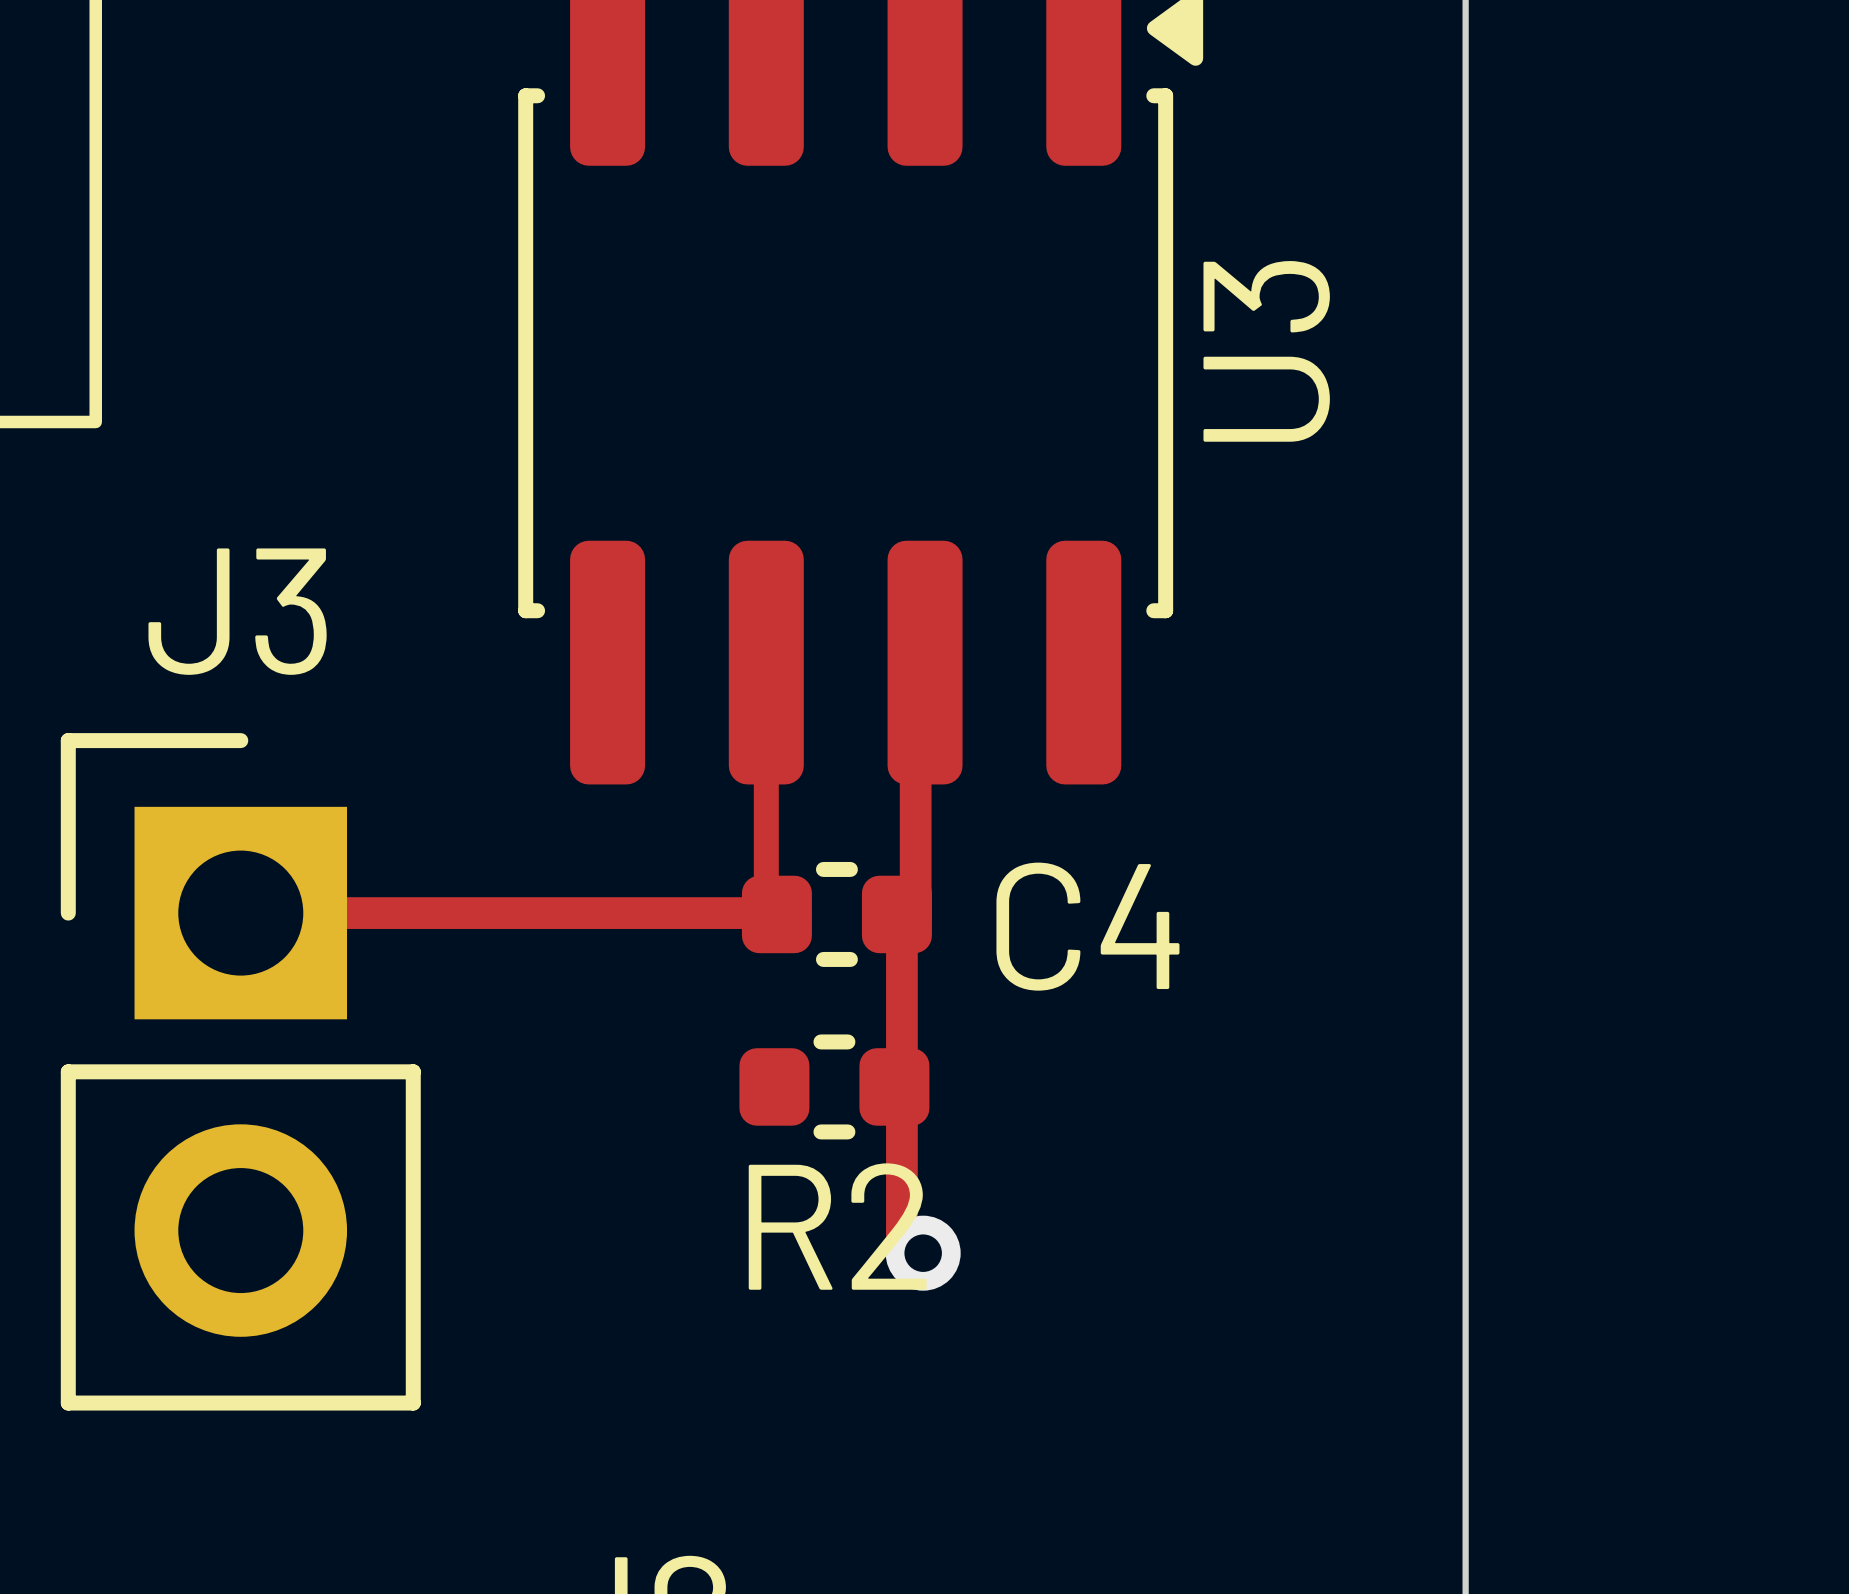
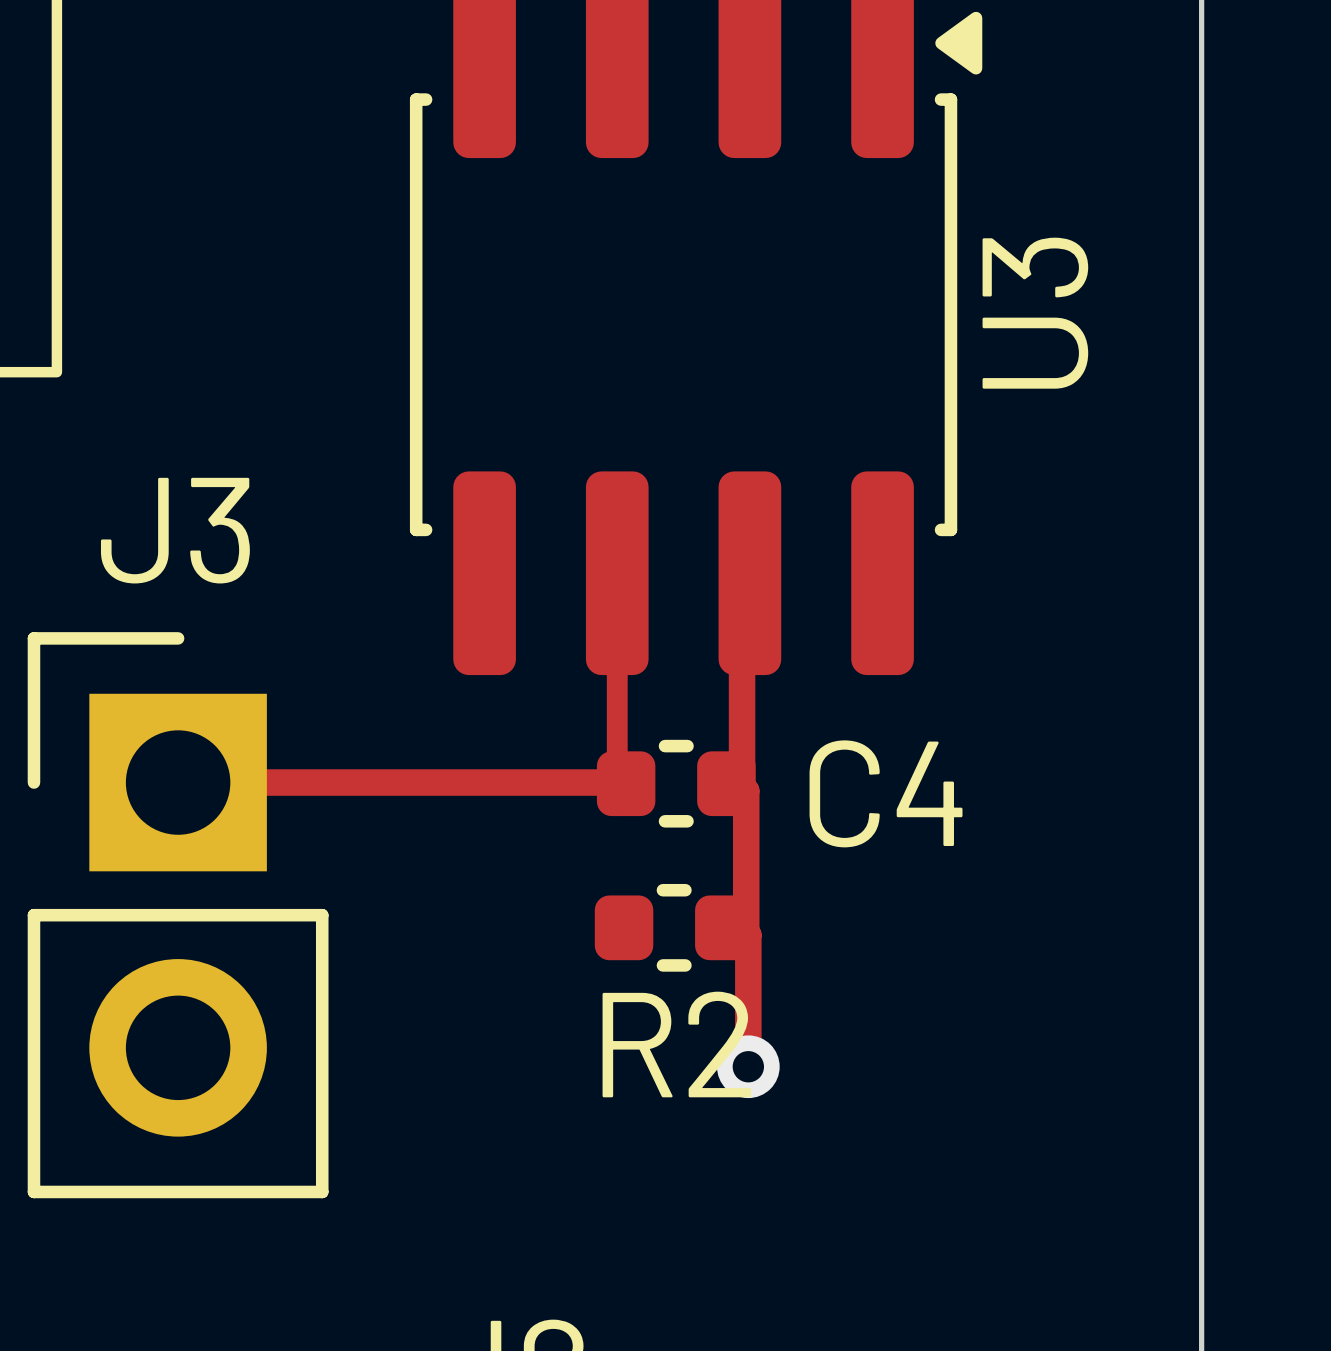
top track: (915, 918) (901, 931) (901, 1231) (923, 1253) -> (742, 786) (746, 791) (748, 1066)

